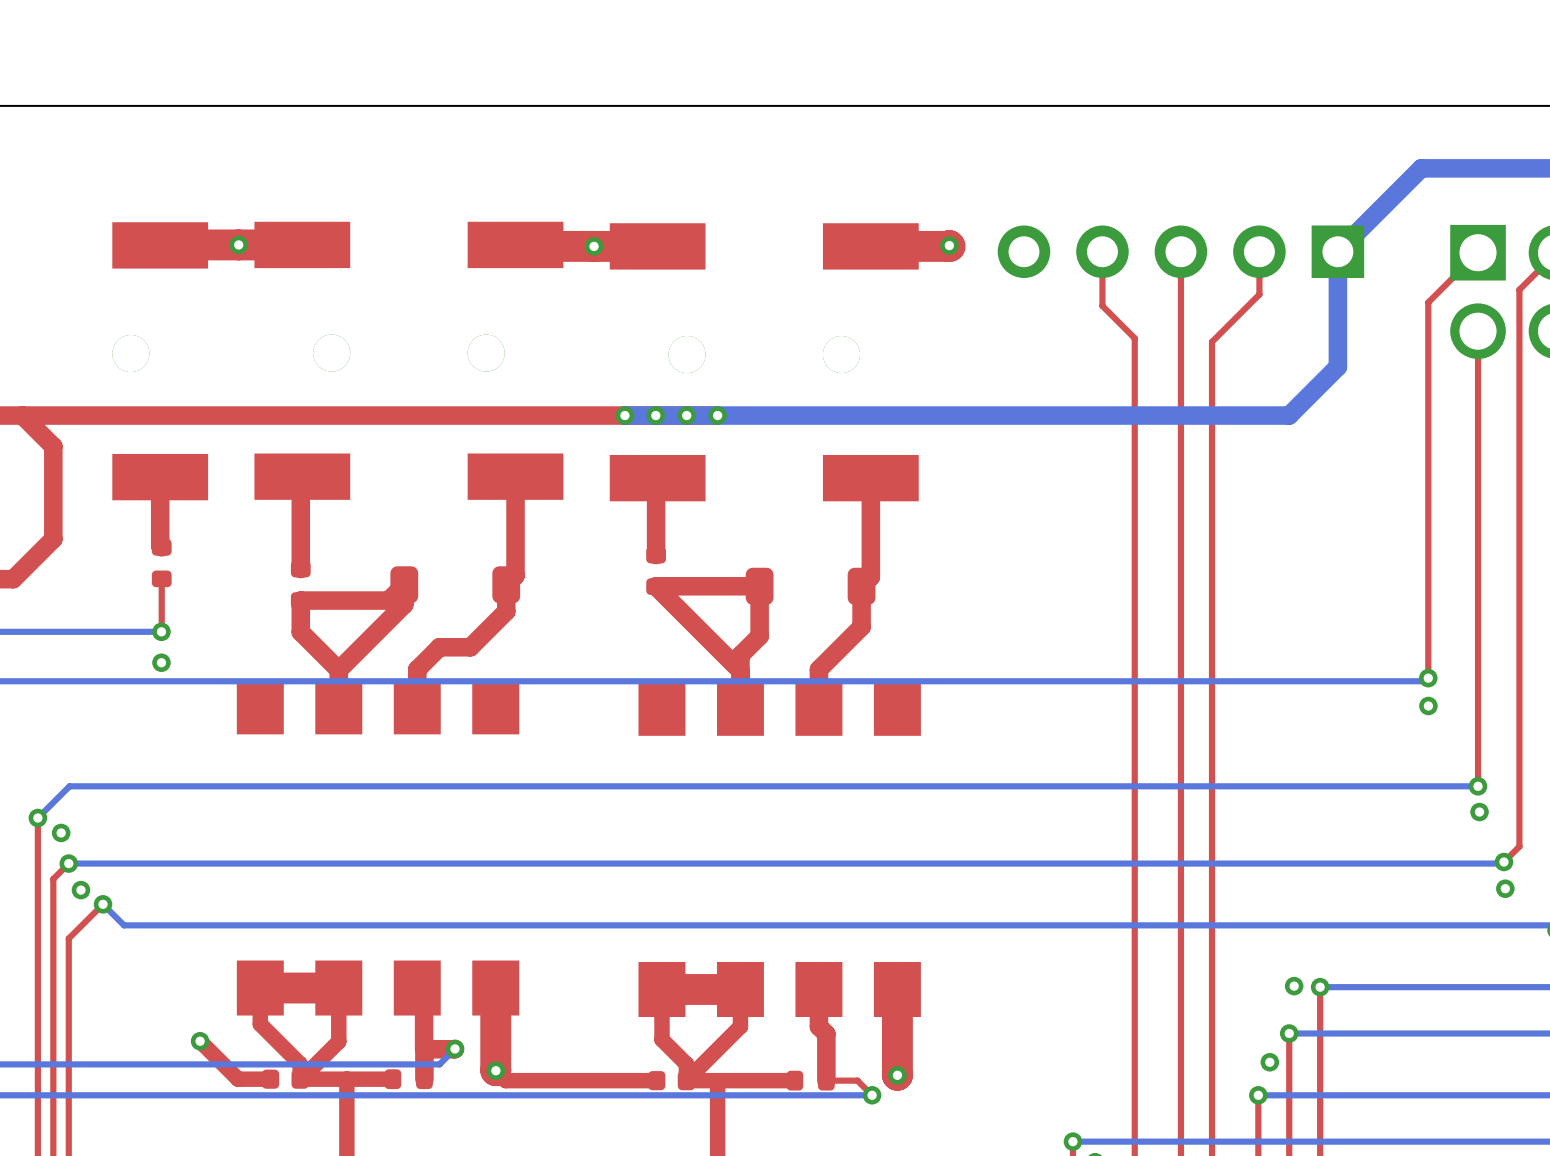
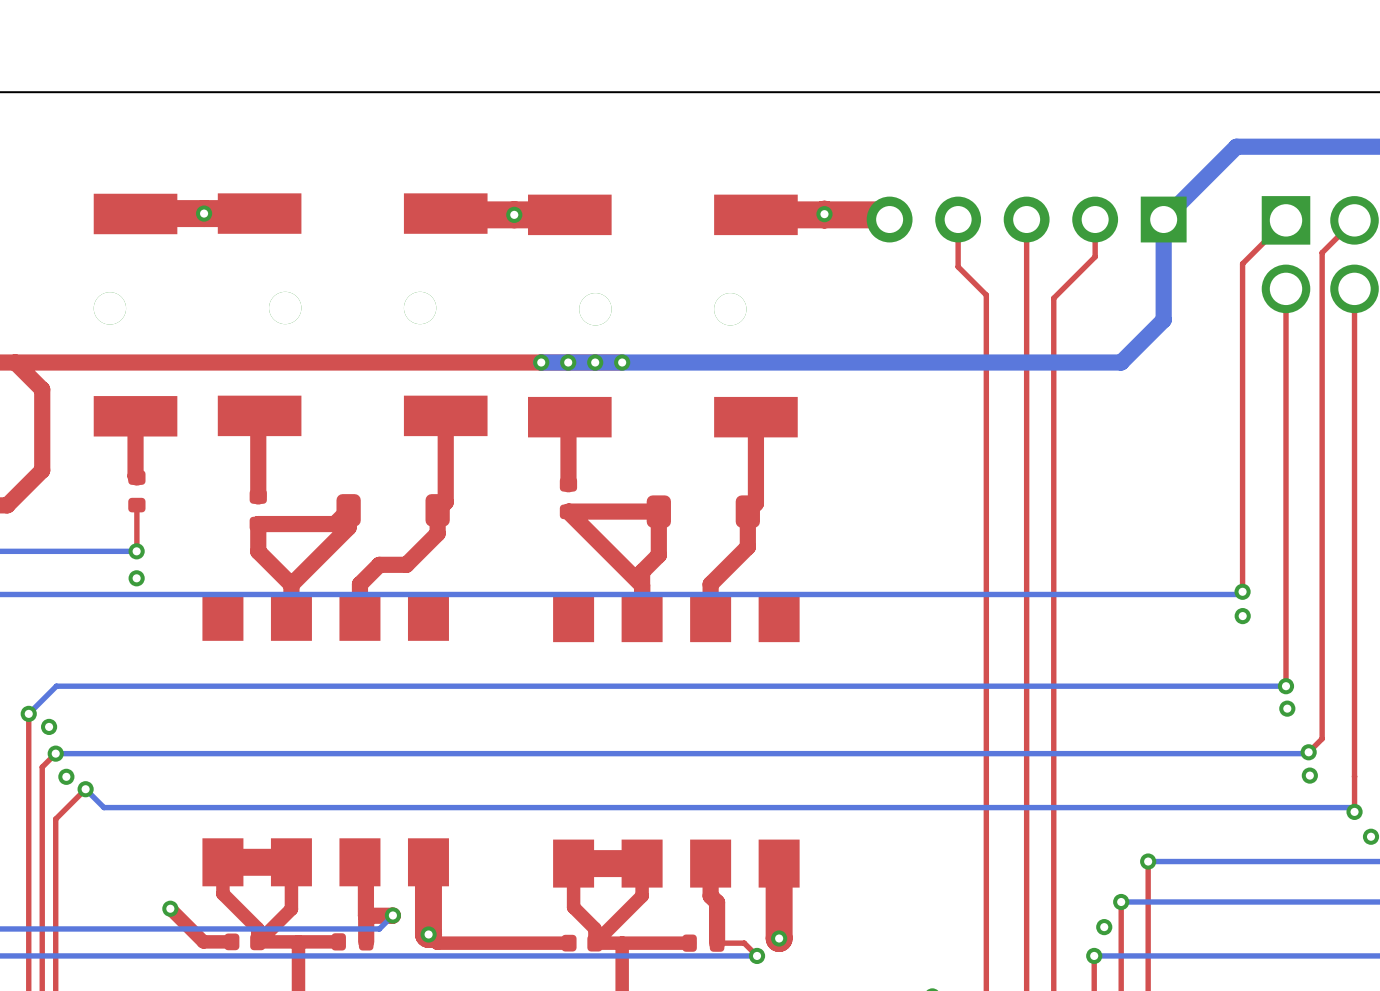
top track: none -> (884, 214) (825, 214)
via: (1294, 986) -> none

